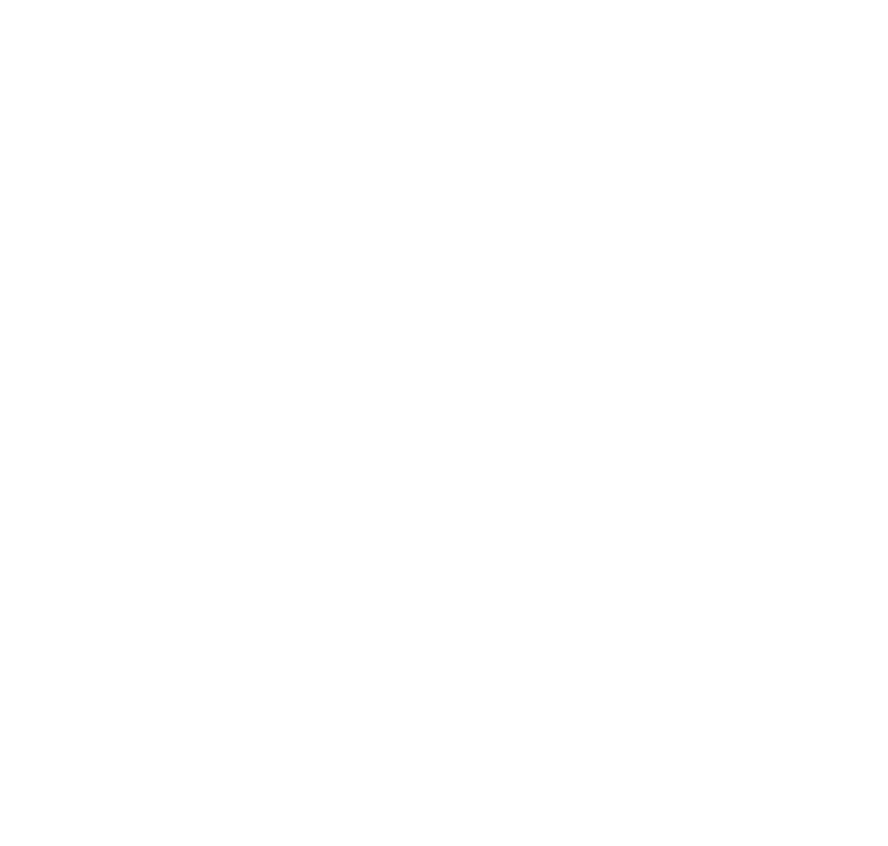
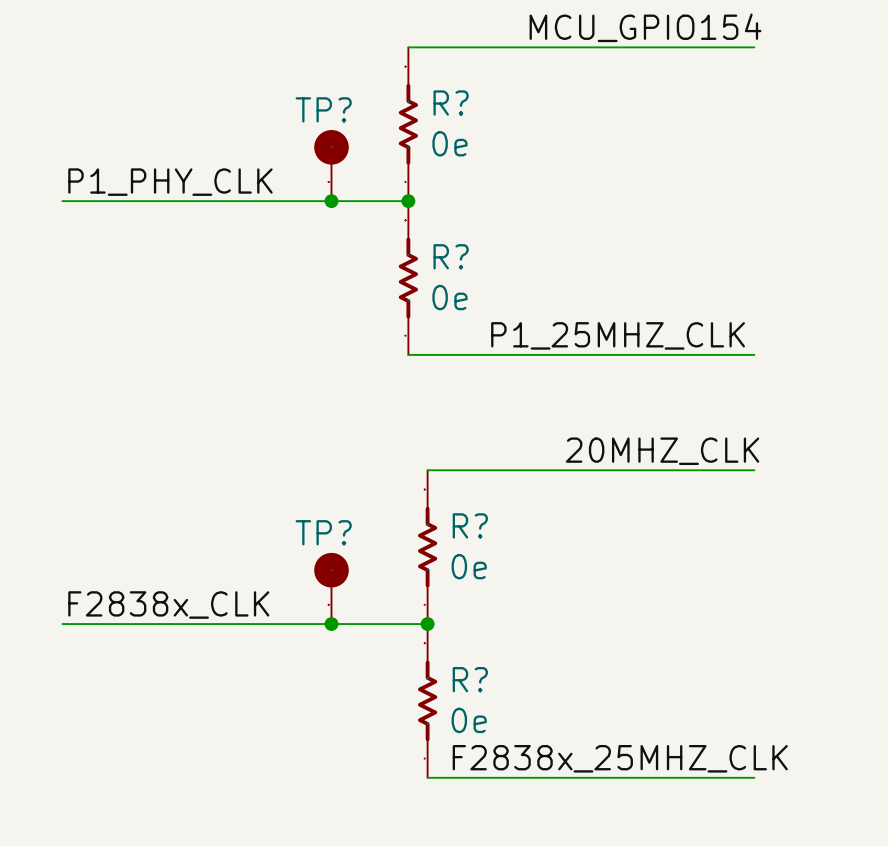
label: none -> MCU_GPIO154 (645, 27)
wire: none -> (408, 47) (754, 47)
R?: none -> 0e (408, 124)
TP?: none -> (331, 165)
label: none -> P1_PHY_CLK (170, 182)
wire: none -> (62, 201) (408, 201)
junction: none -> (331, 201)
junction: none -> (408, 201)
R?: none -> 0e (408, 278)
label: none -> P1_25MHZ_CLK (618, 335)
wire: none -> (408, 354) (754, 354)
label: none -> 20MHZ_CLK (662, 451)
wire: none -> (427, 470) (754, 470)
R?: none -> 0e (427, 547)
TP?: none -> (331, 588)
label: none -> F2838x_CLK (168, 605)
wire: none -> (62, 624) (427, 624)
junction: none -> (331, 624)
junction: none -> (427, 624)
R?: none -> 0e (427, 700)
label: none -> F2838x_25MHZ_CLK (620, 758)
wire: none -> (427, 777) (754, 777)

